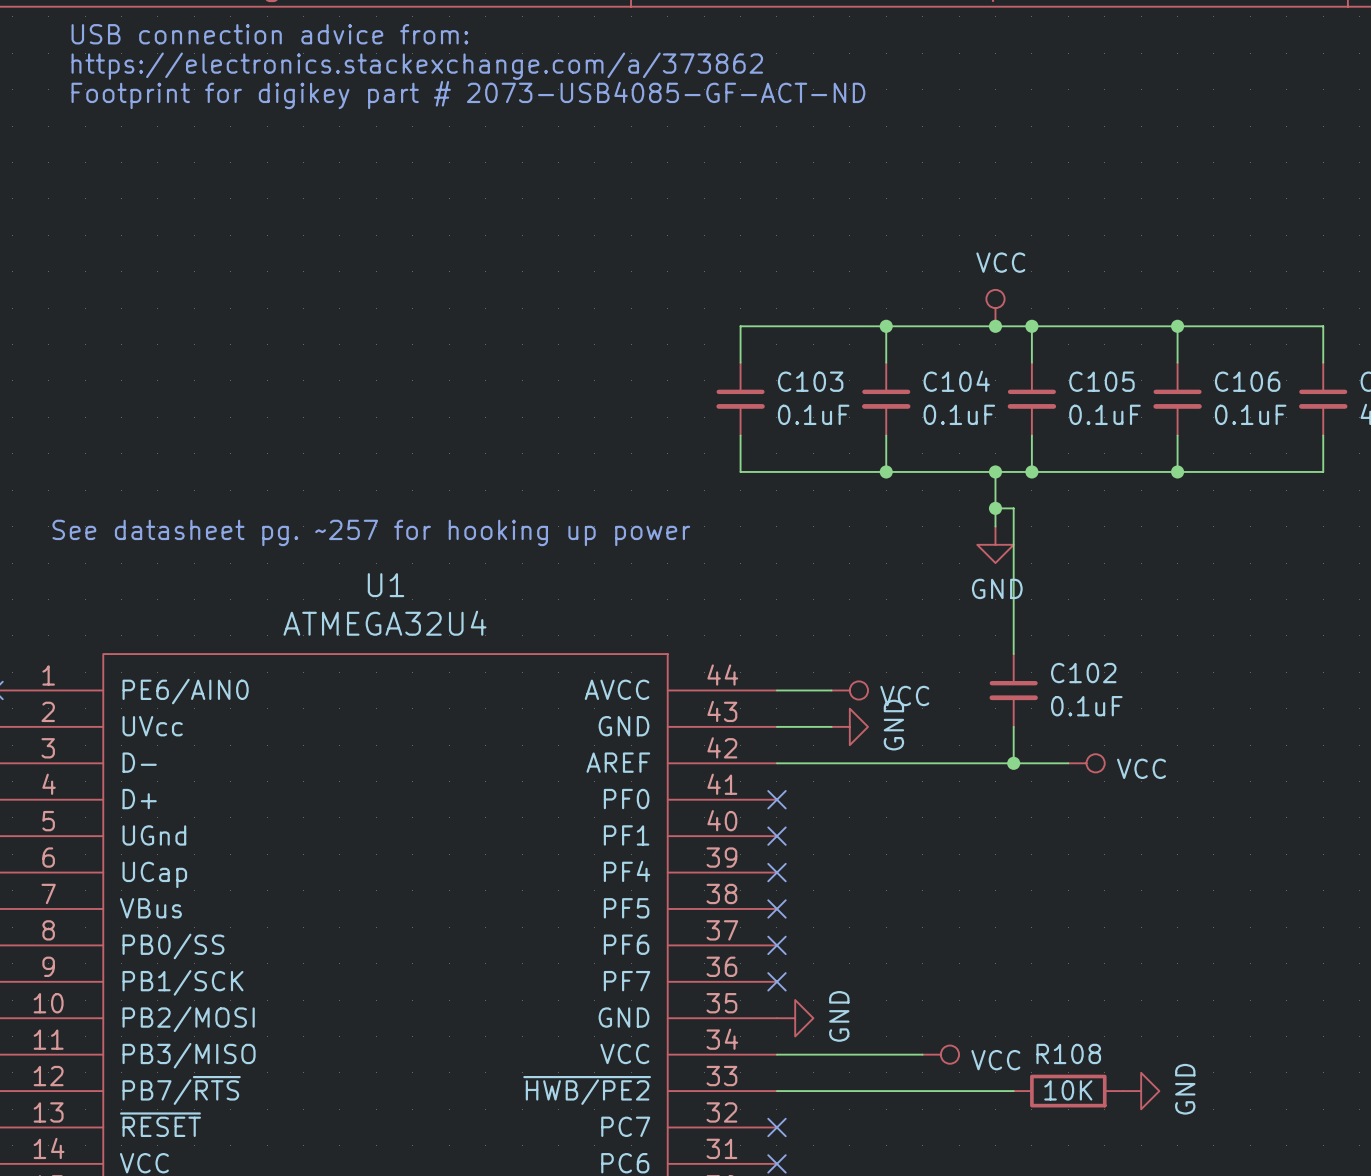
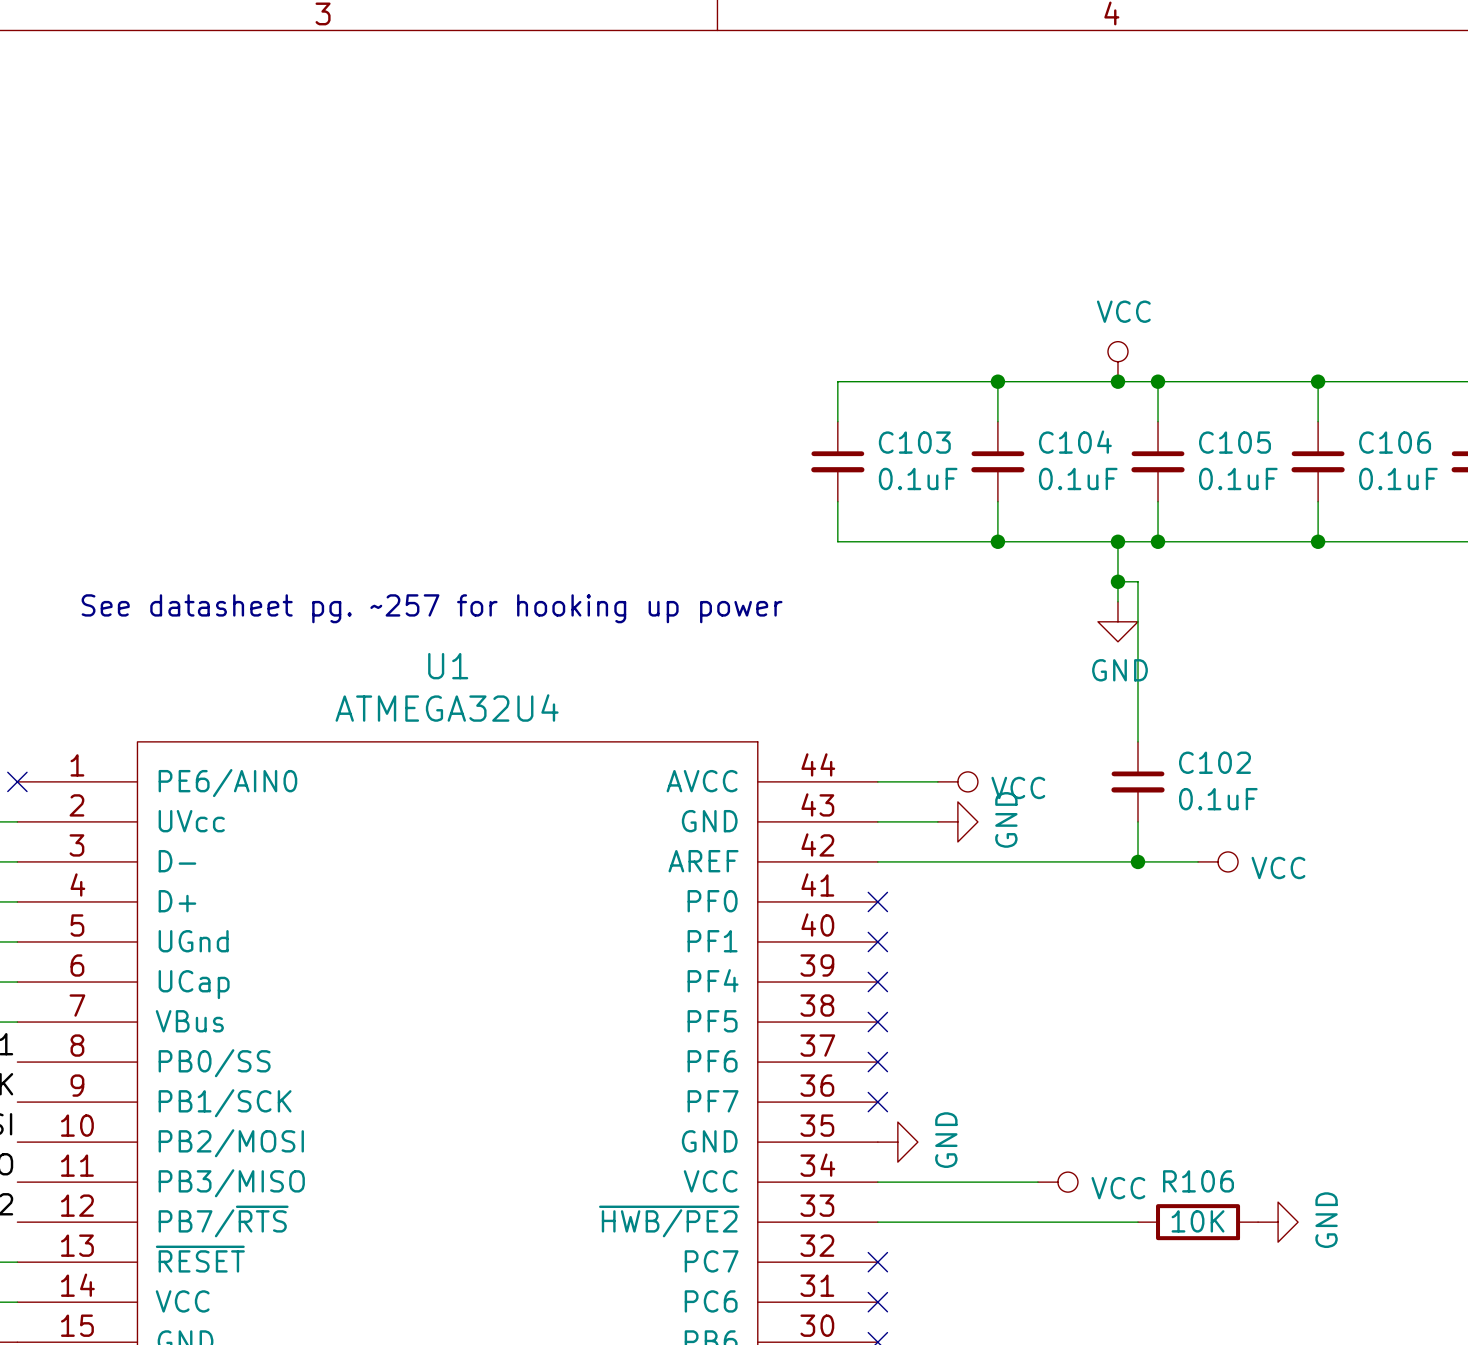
text: USB connection advice from: (269, 34) -> none
text: https://electronics.stackexchange.com/a/373862 (417, 66) -> none
text: Footprint for digikey part # 2073-USB4085-GF-ACT-ND (468, 95) -> none
R108 name: R108 (1068, 1053) -> R106 (1198, 1181)

